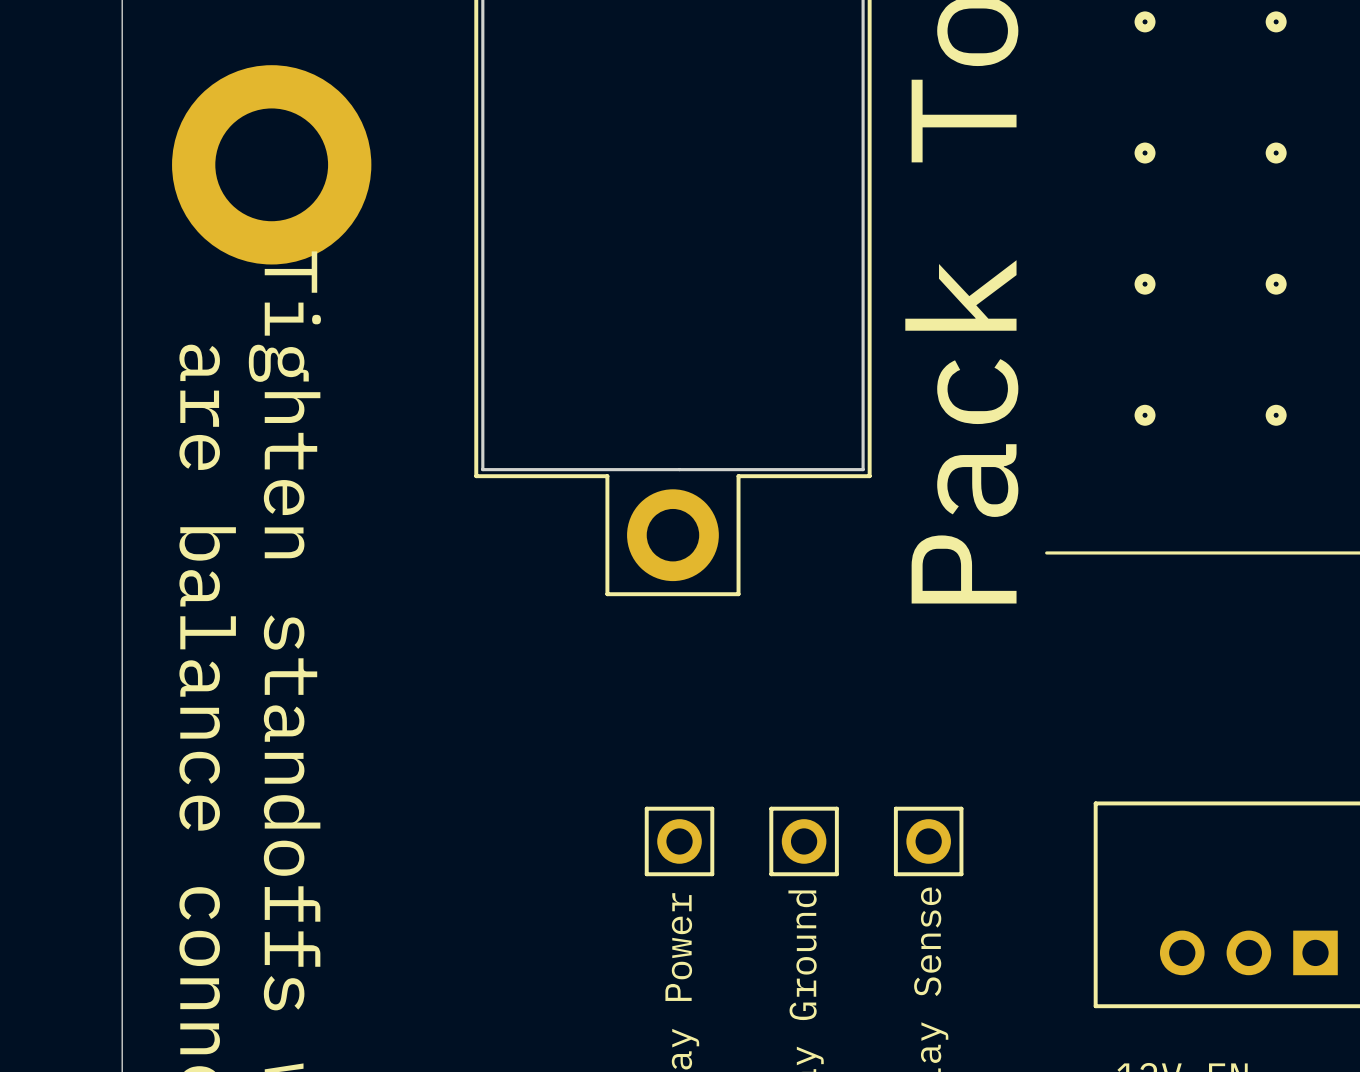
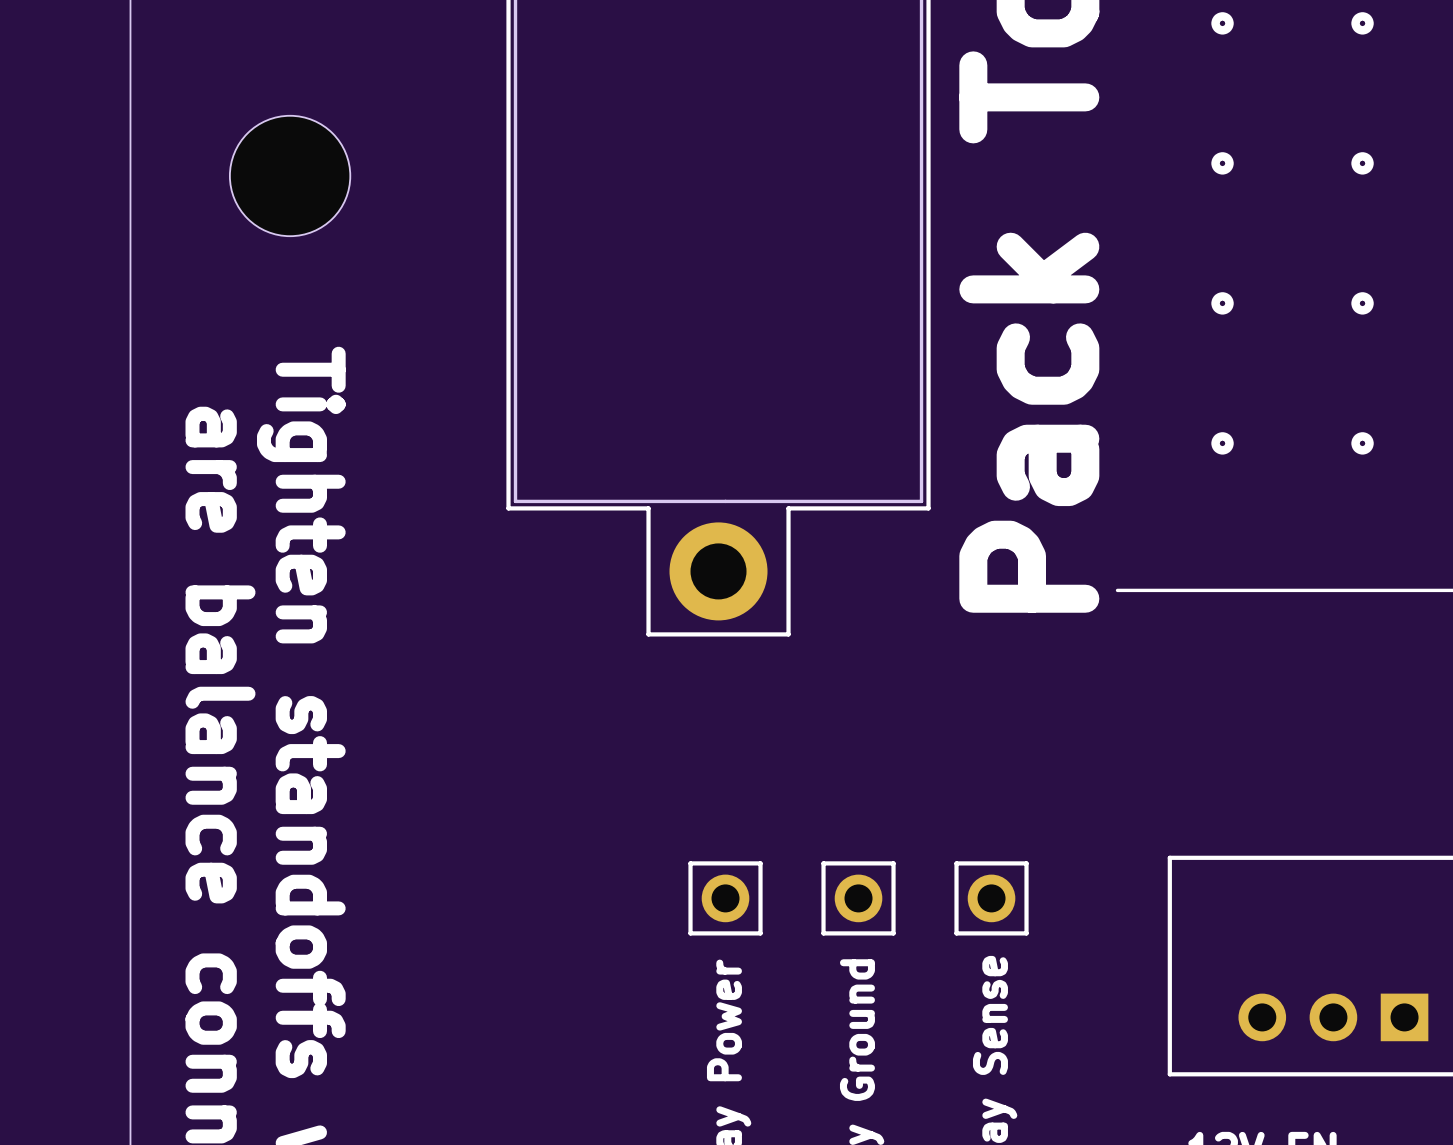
part footprint: [172, 65, 372, 265] -> [229, 115, 351, 237]

